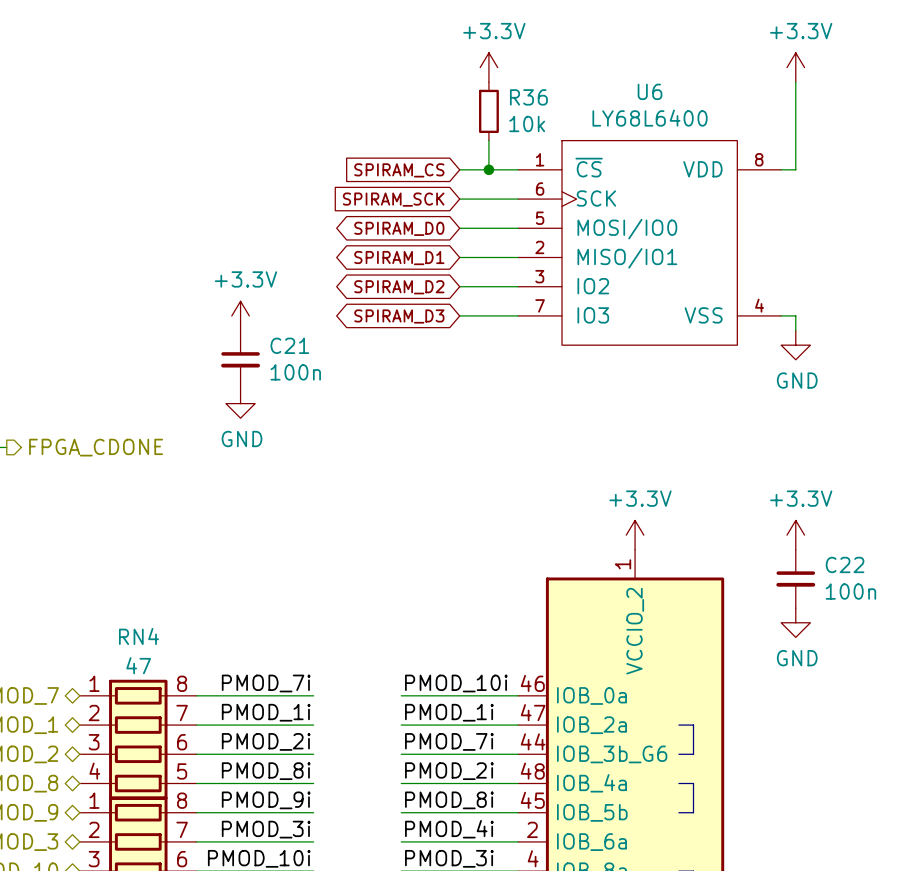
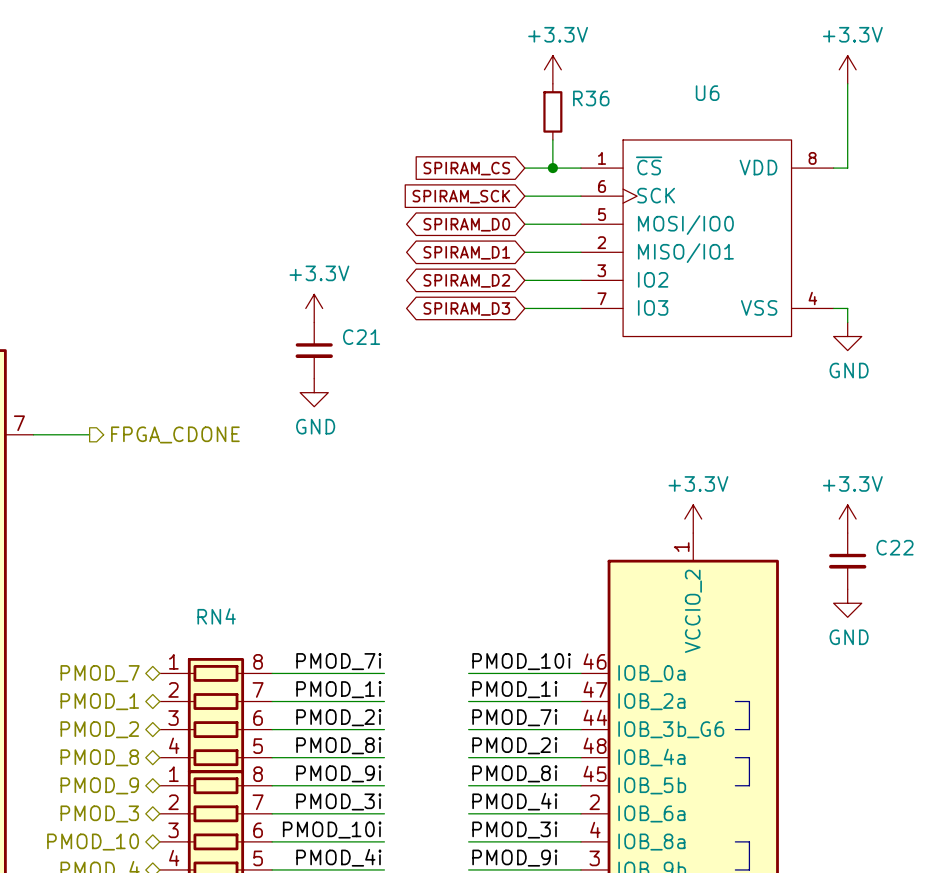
U6 value: LY68L6400 (650, 118) -> none
R36 value: 10k (527, 123) -> none
C21 value: 100n (295, 372) -> none
C22 value: 100n (850, 591) -> none
RN4 value: 47 (138, 665) -> none

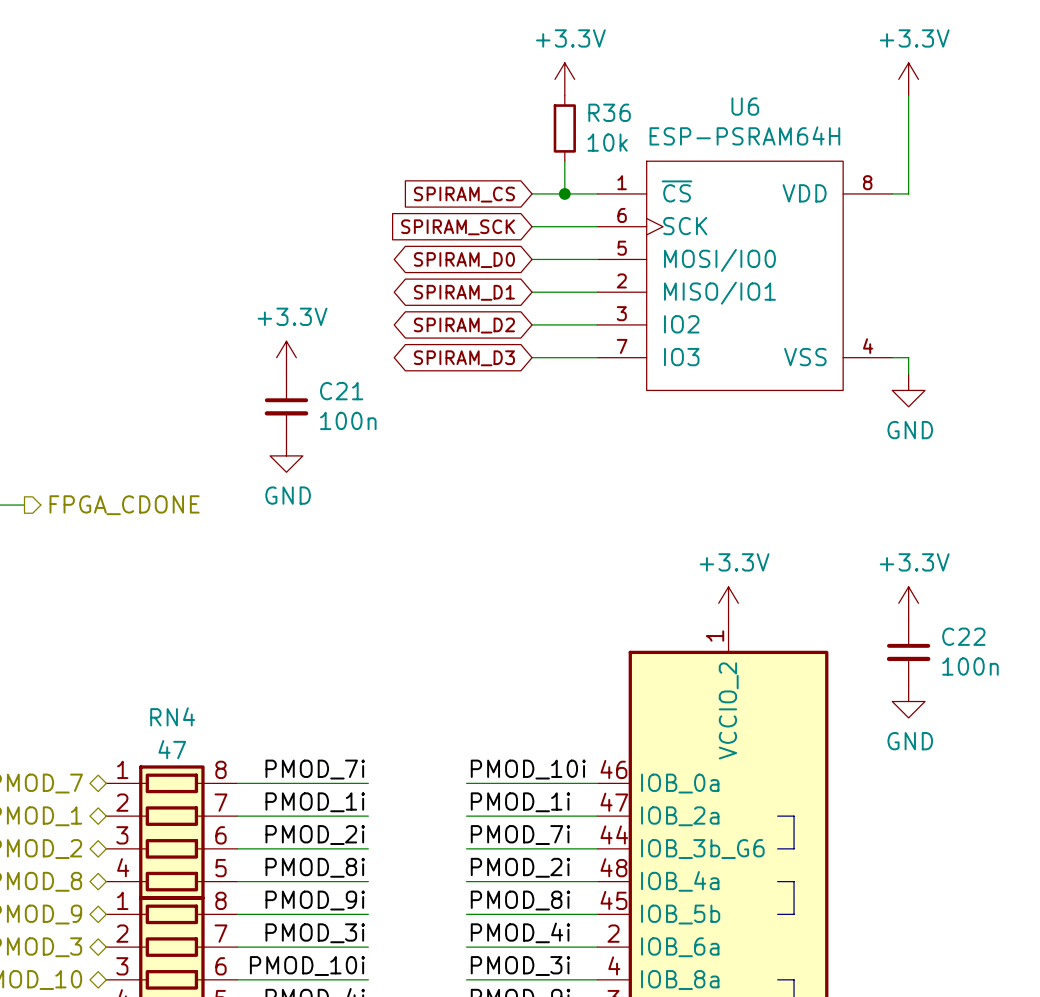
U6 value: none -> ESP-PSRAM64H (744, 135)
R36 value: none -> 10k (607, 142)
C21 value: none -> 100n (348, 420)
C22 value: none -> 100n (970, 666)
RN4 value: none -> 47 (172, 749)

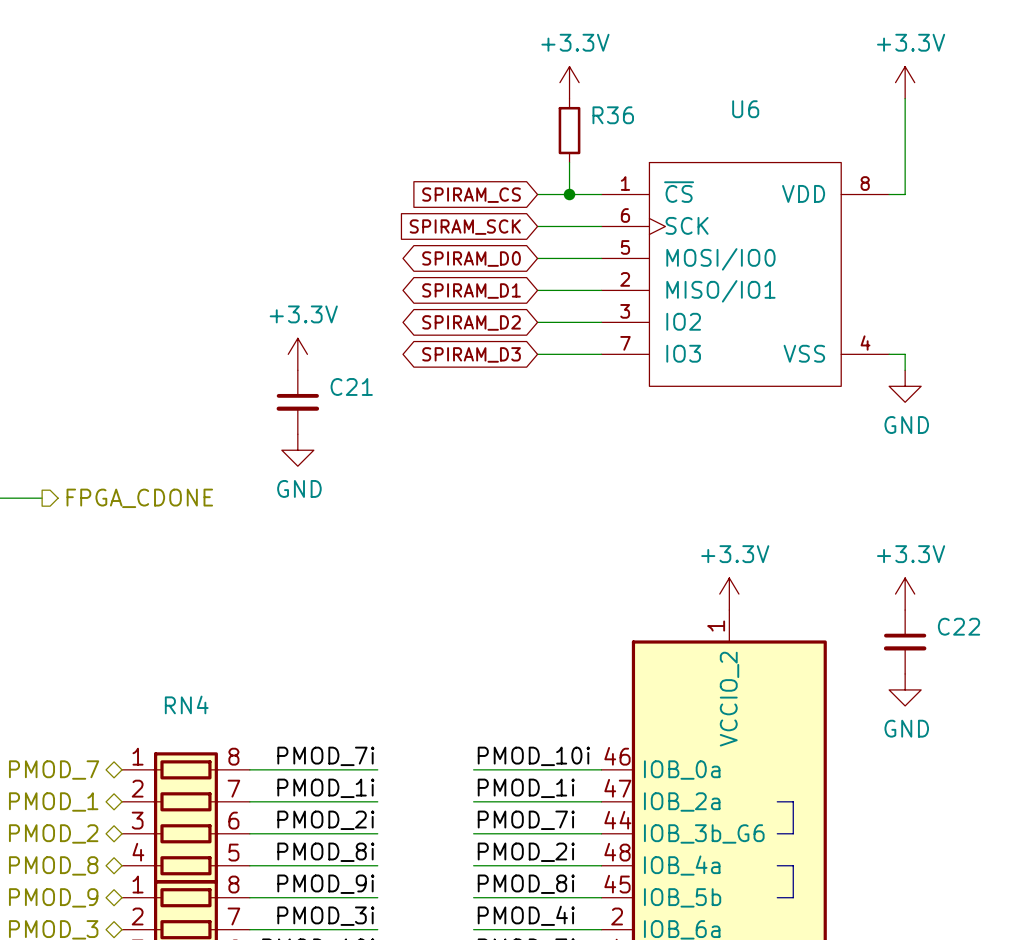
U6 value: ESP-PSRAM64H (744, 135) -> none
R36 value: 10k (607, 142) -> none
C21 value: 100n (348, 420) -> none
C22 value: 100n (970, 666) -> none
RN4 value: 47 (172, 749) -> none

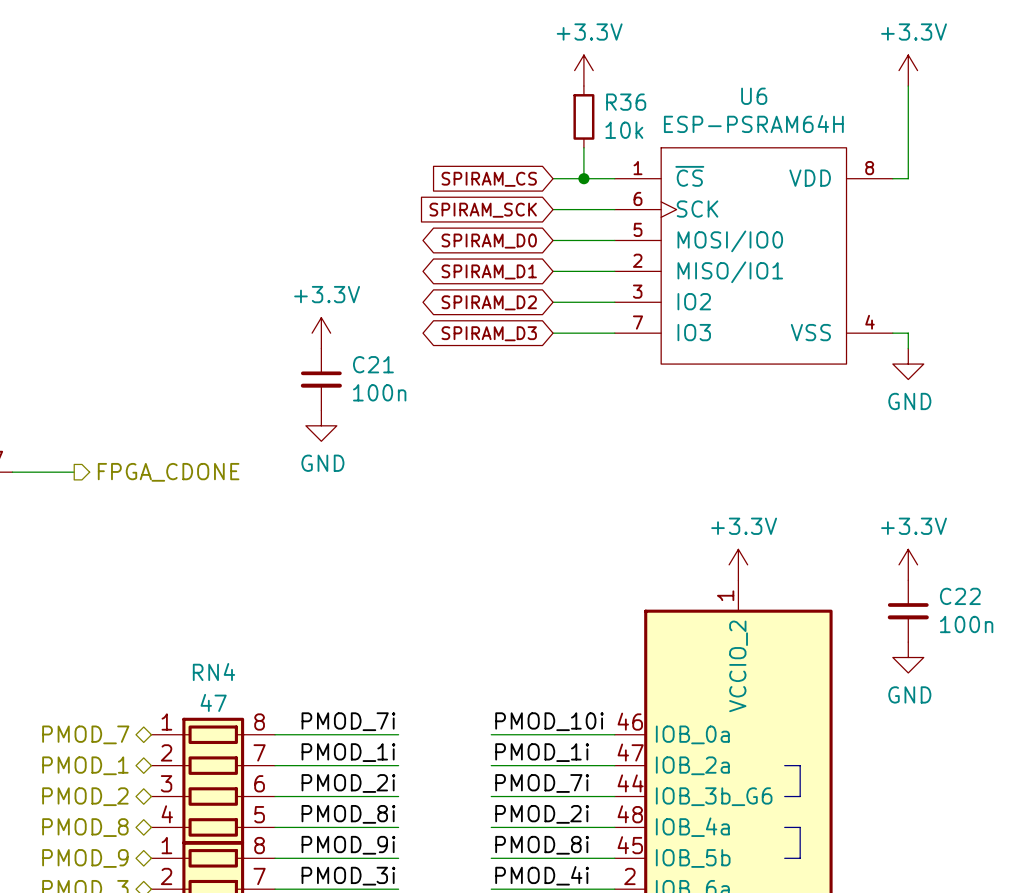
U6 value: none -> ESP-PSRAM64H (753, 124)
R36 value: none -> 10k (624, 130)
C21 value: none -> 100n (379, 392)
C22 value: none -> 100n (966, 624)
RN4 value: none -> 47 (213, 702)

